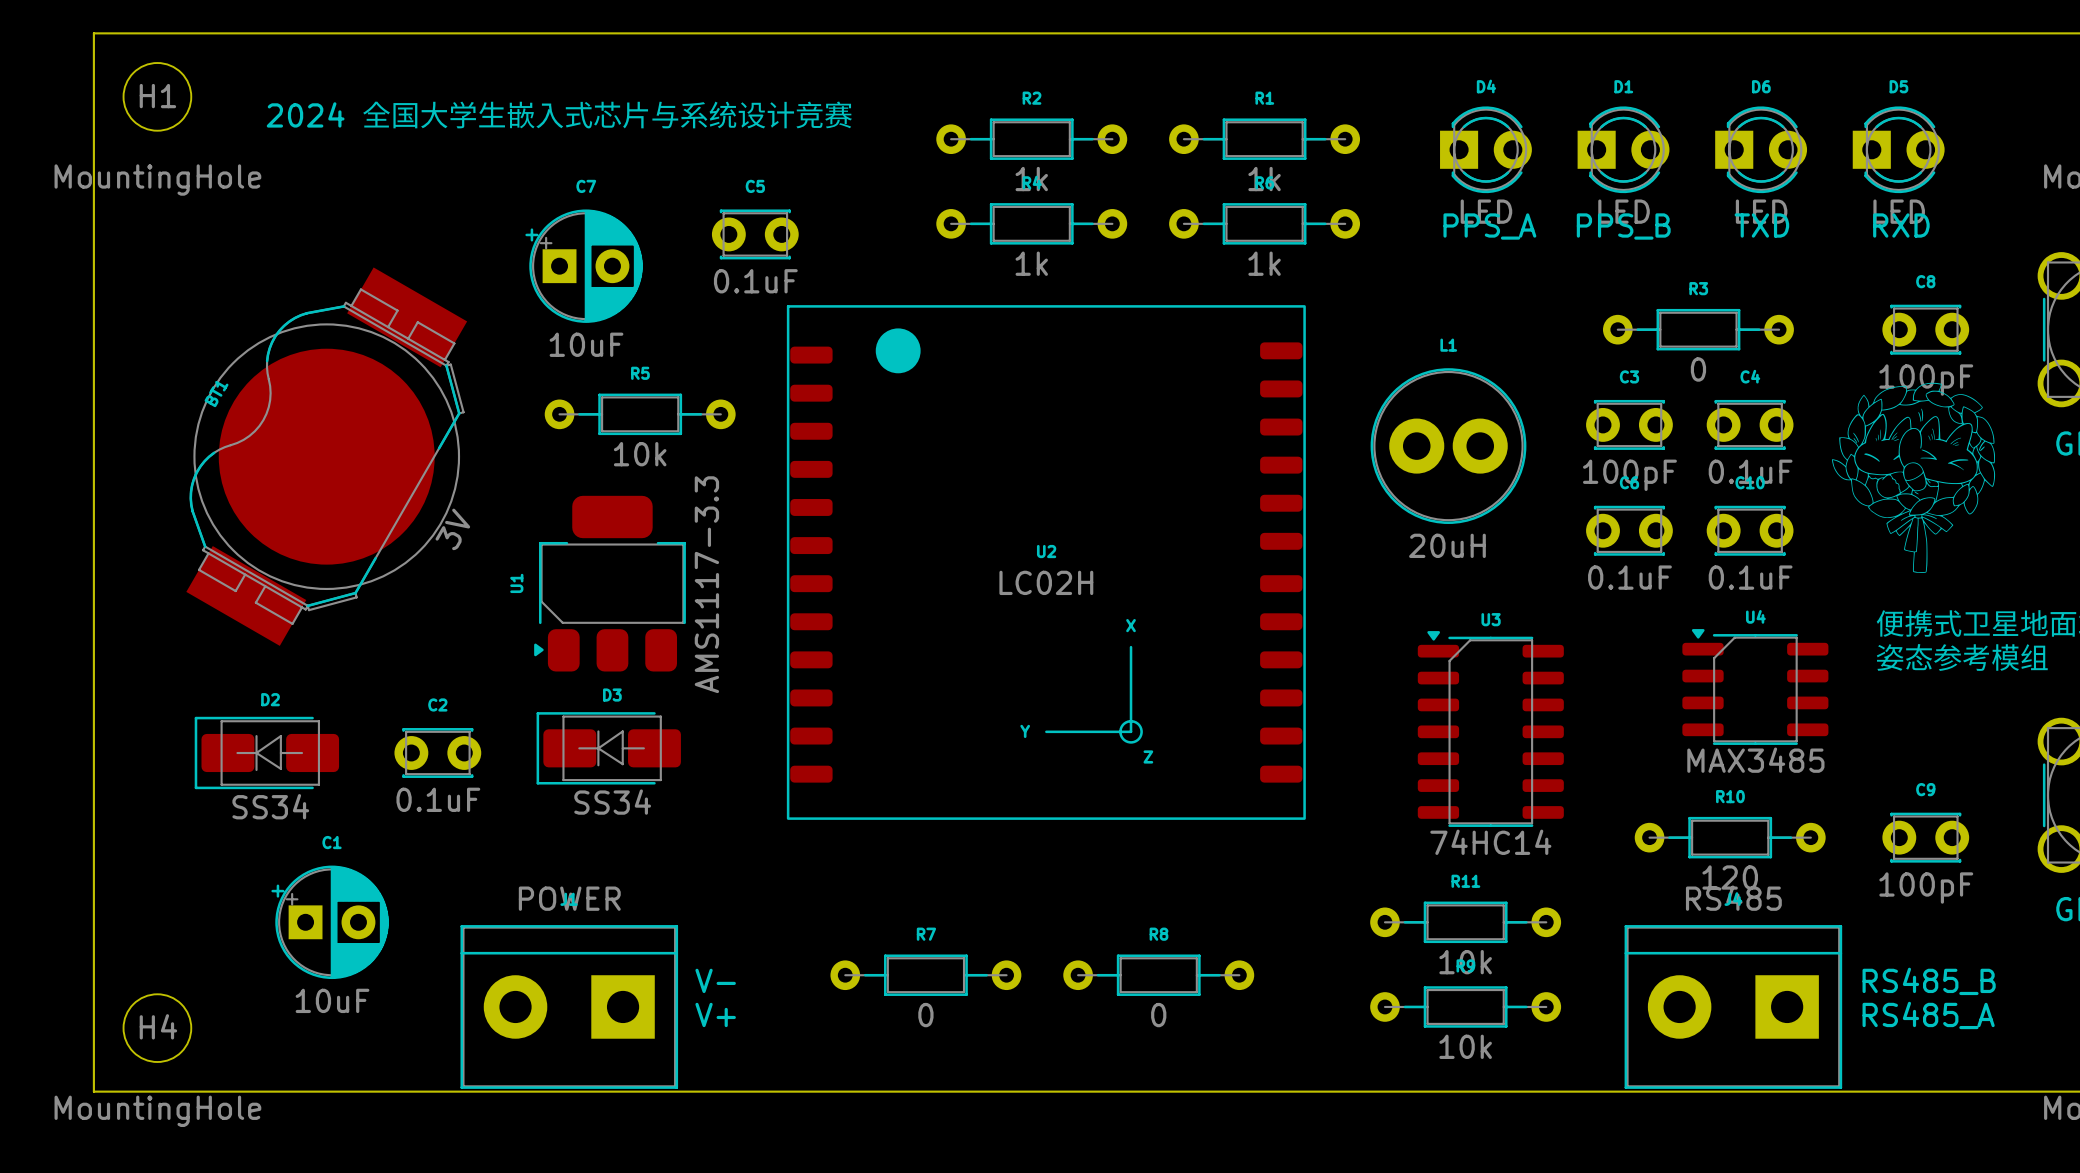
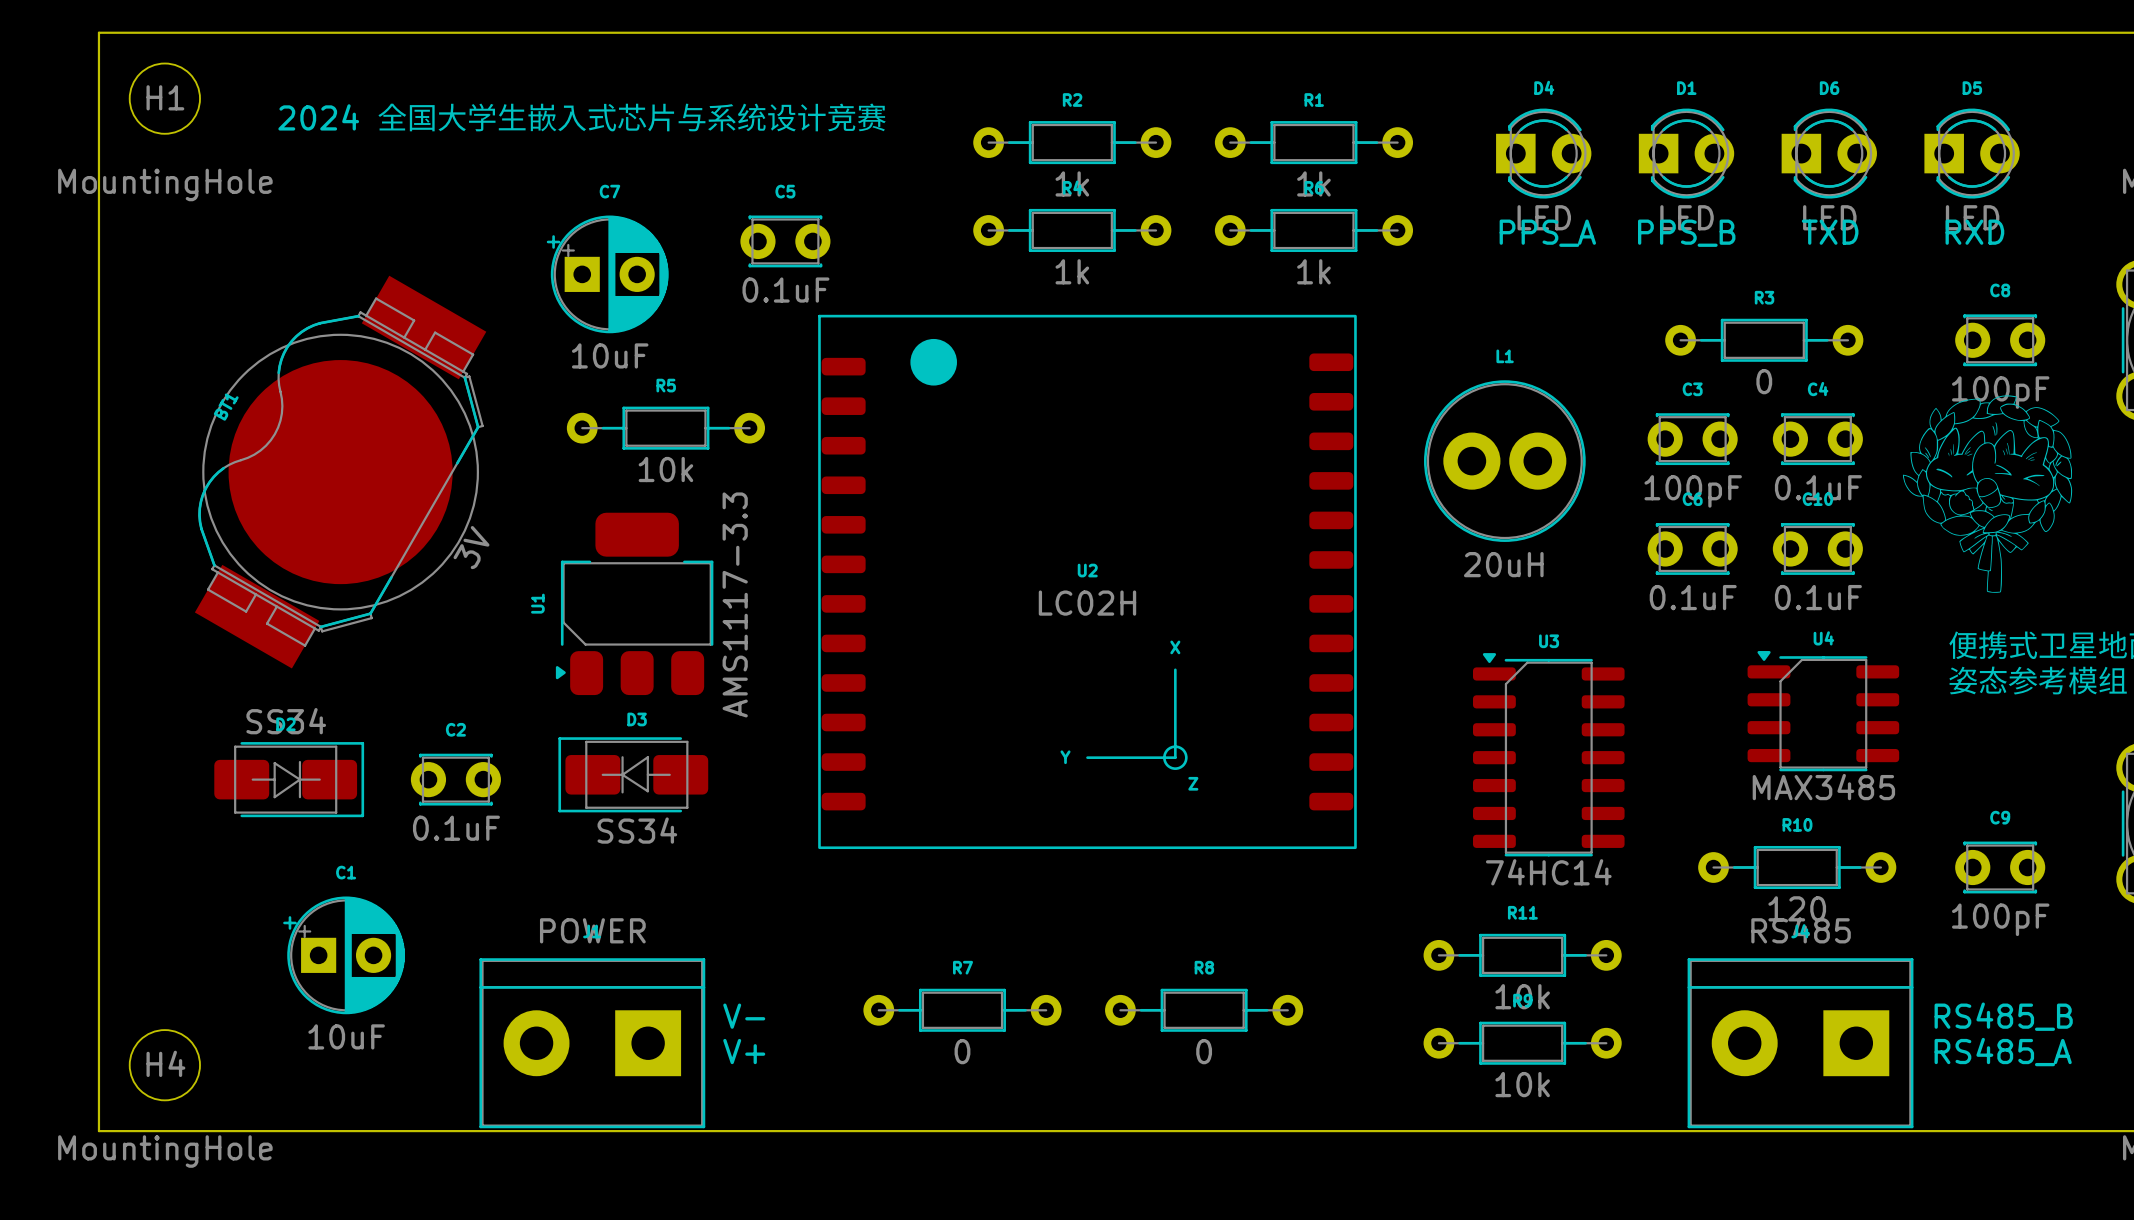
D2 rotation: 0° (266, 752) -> 180° (289, 779)

